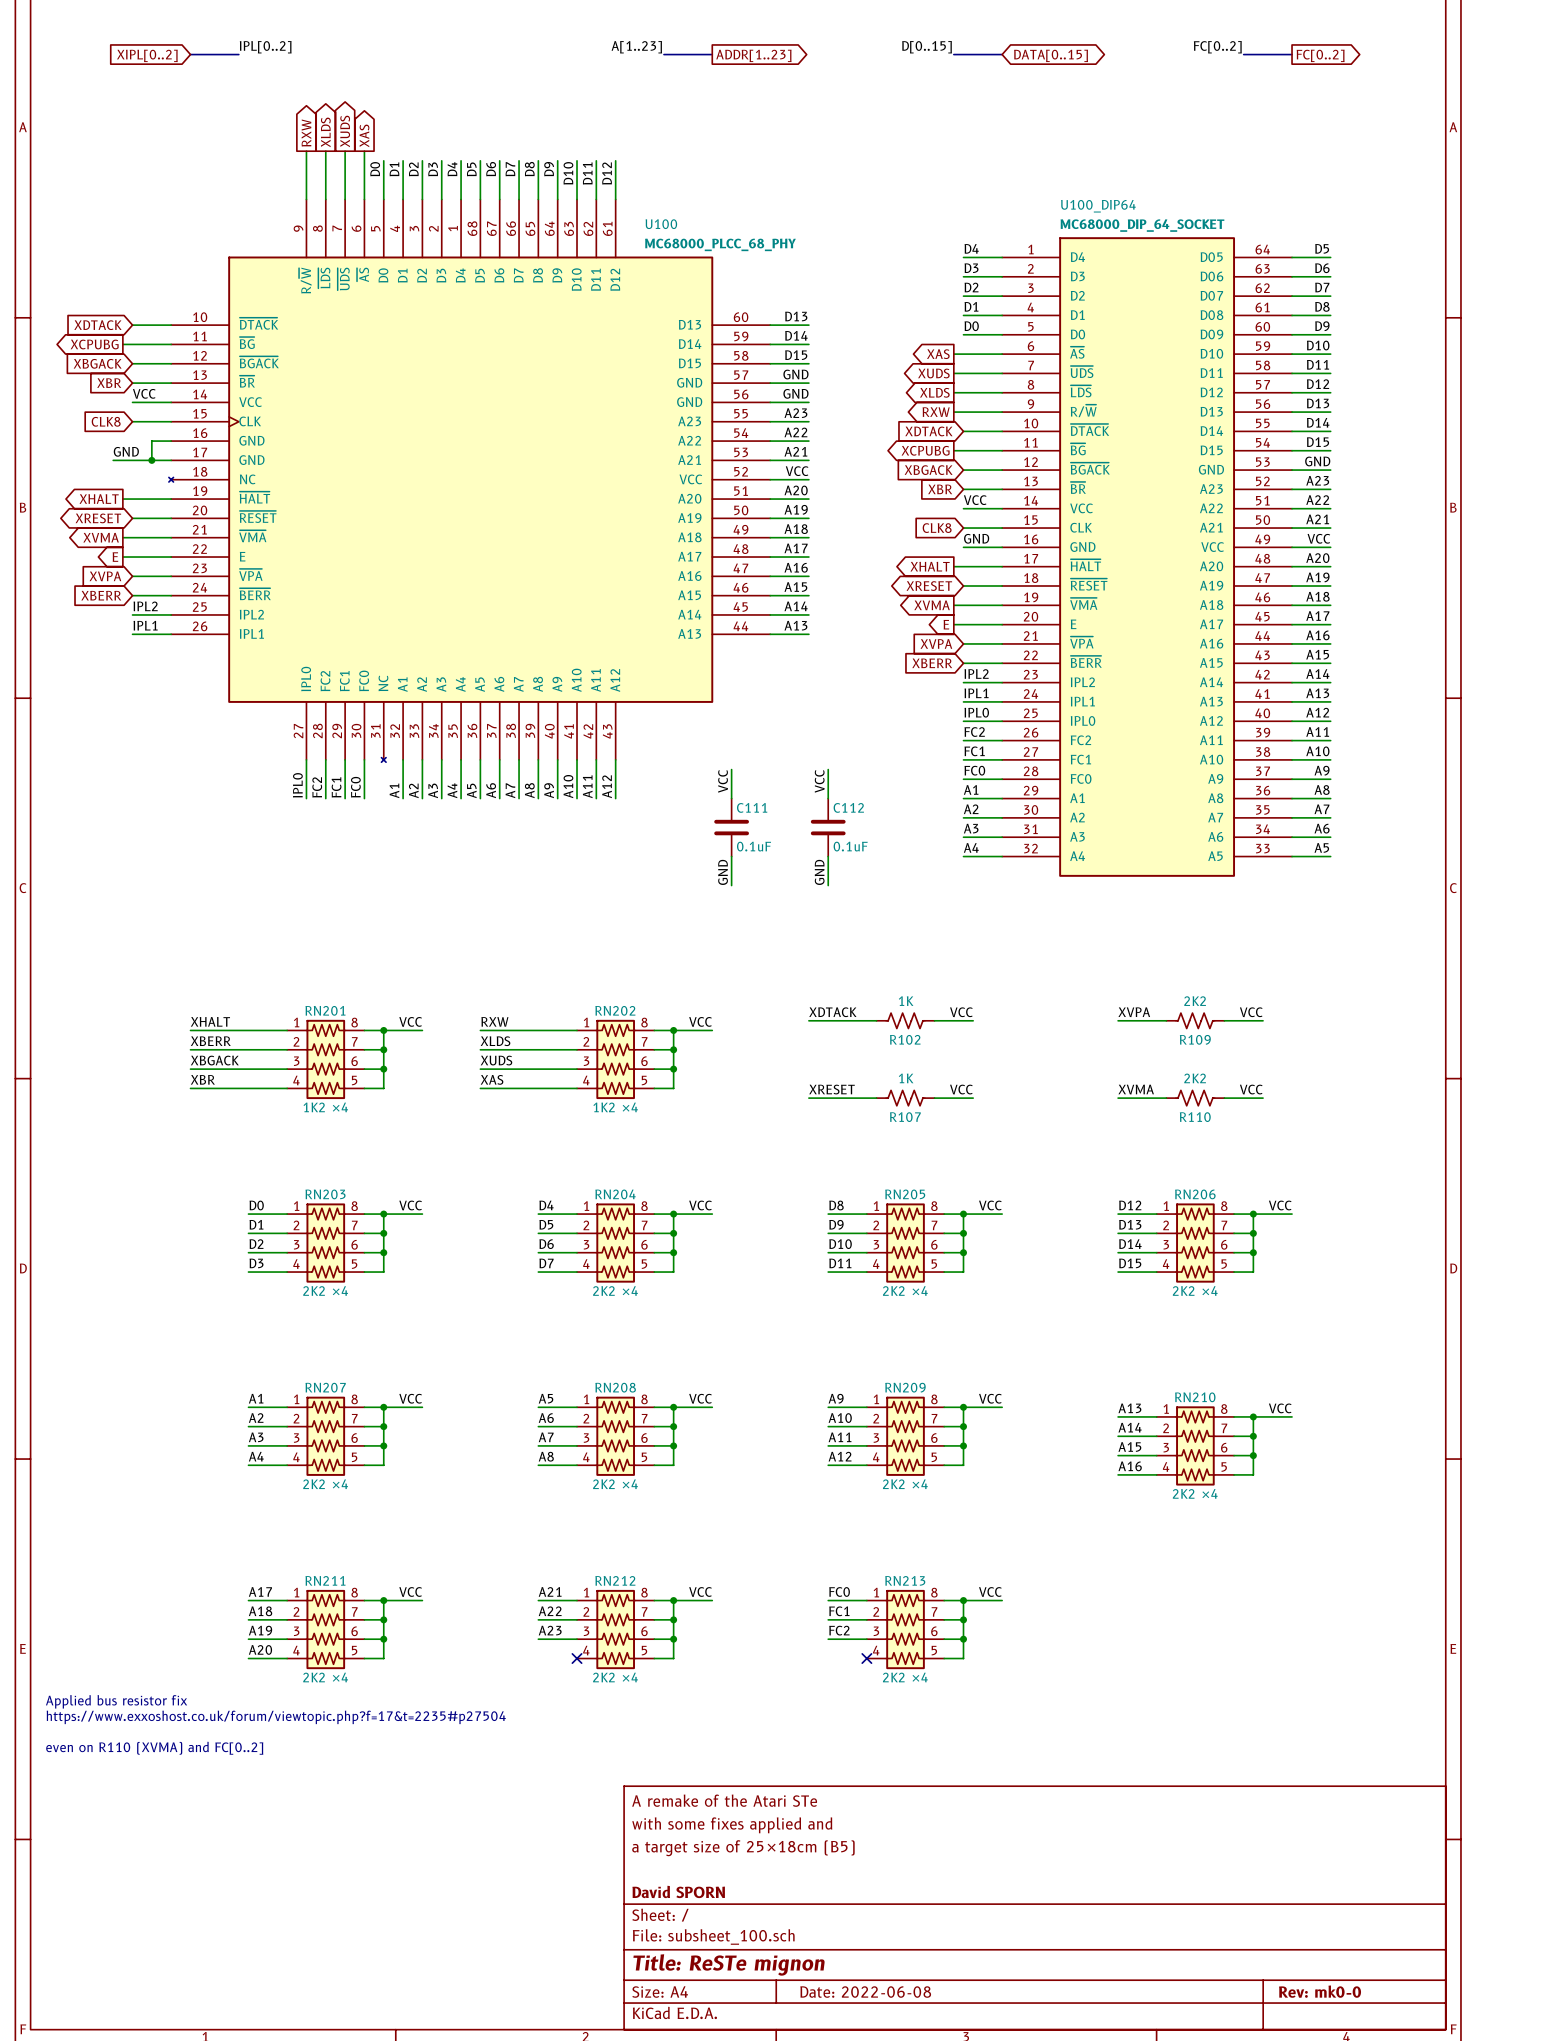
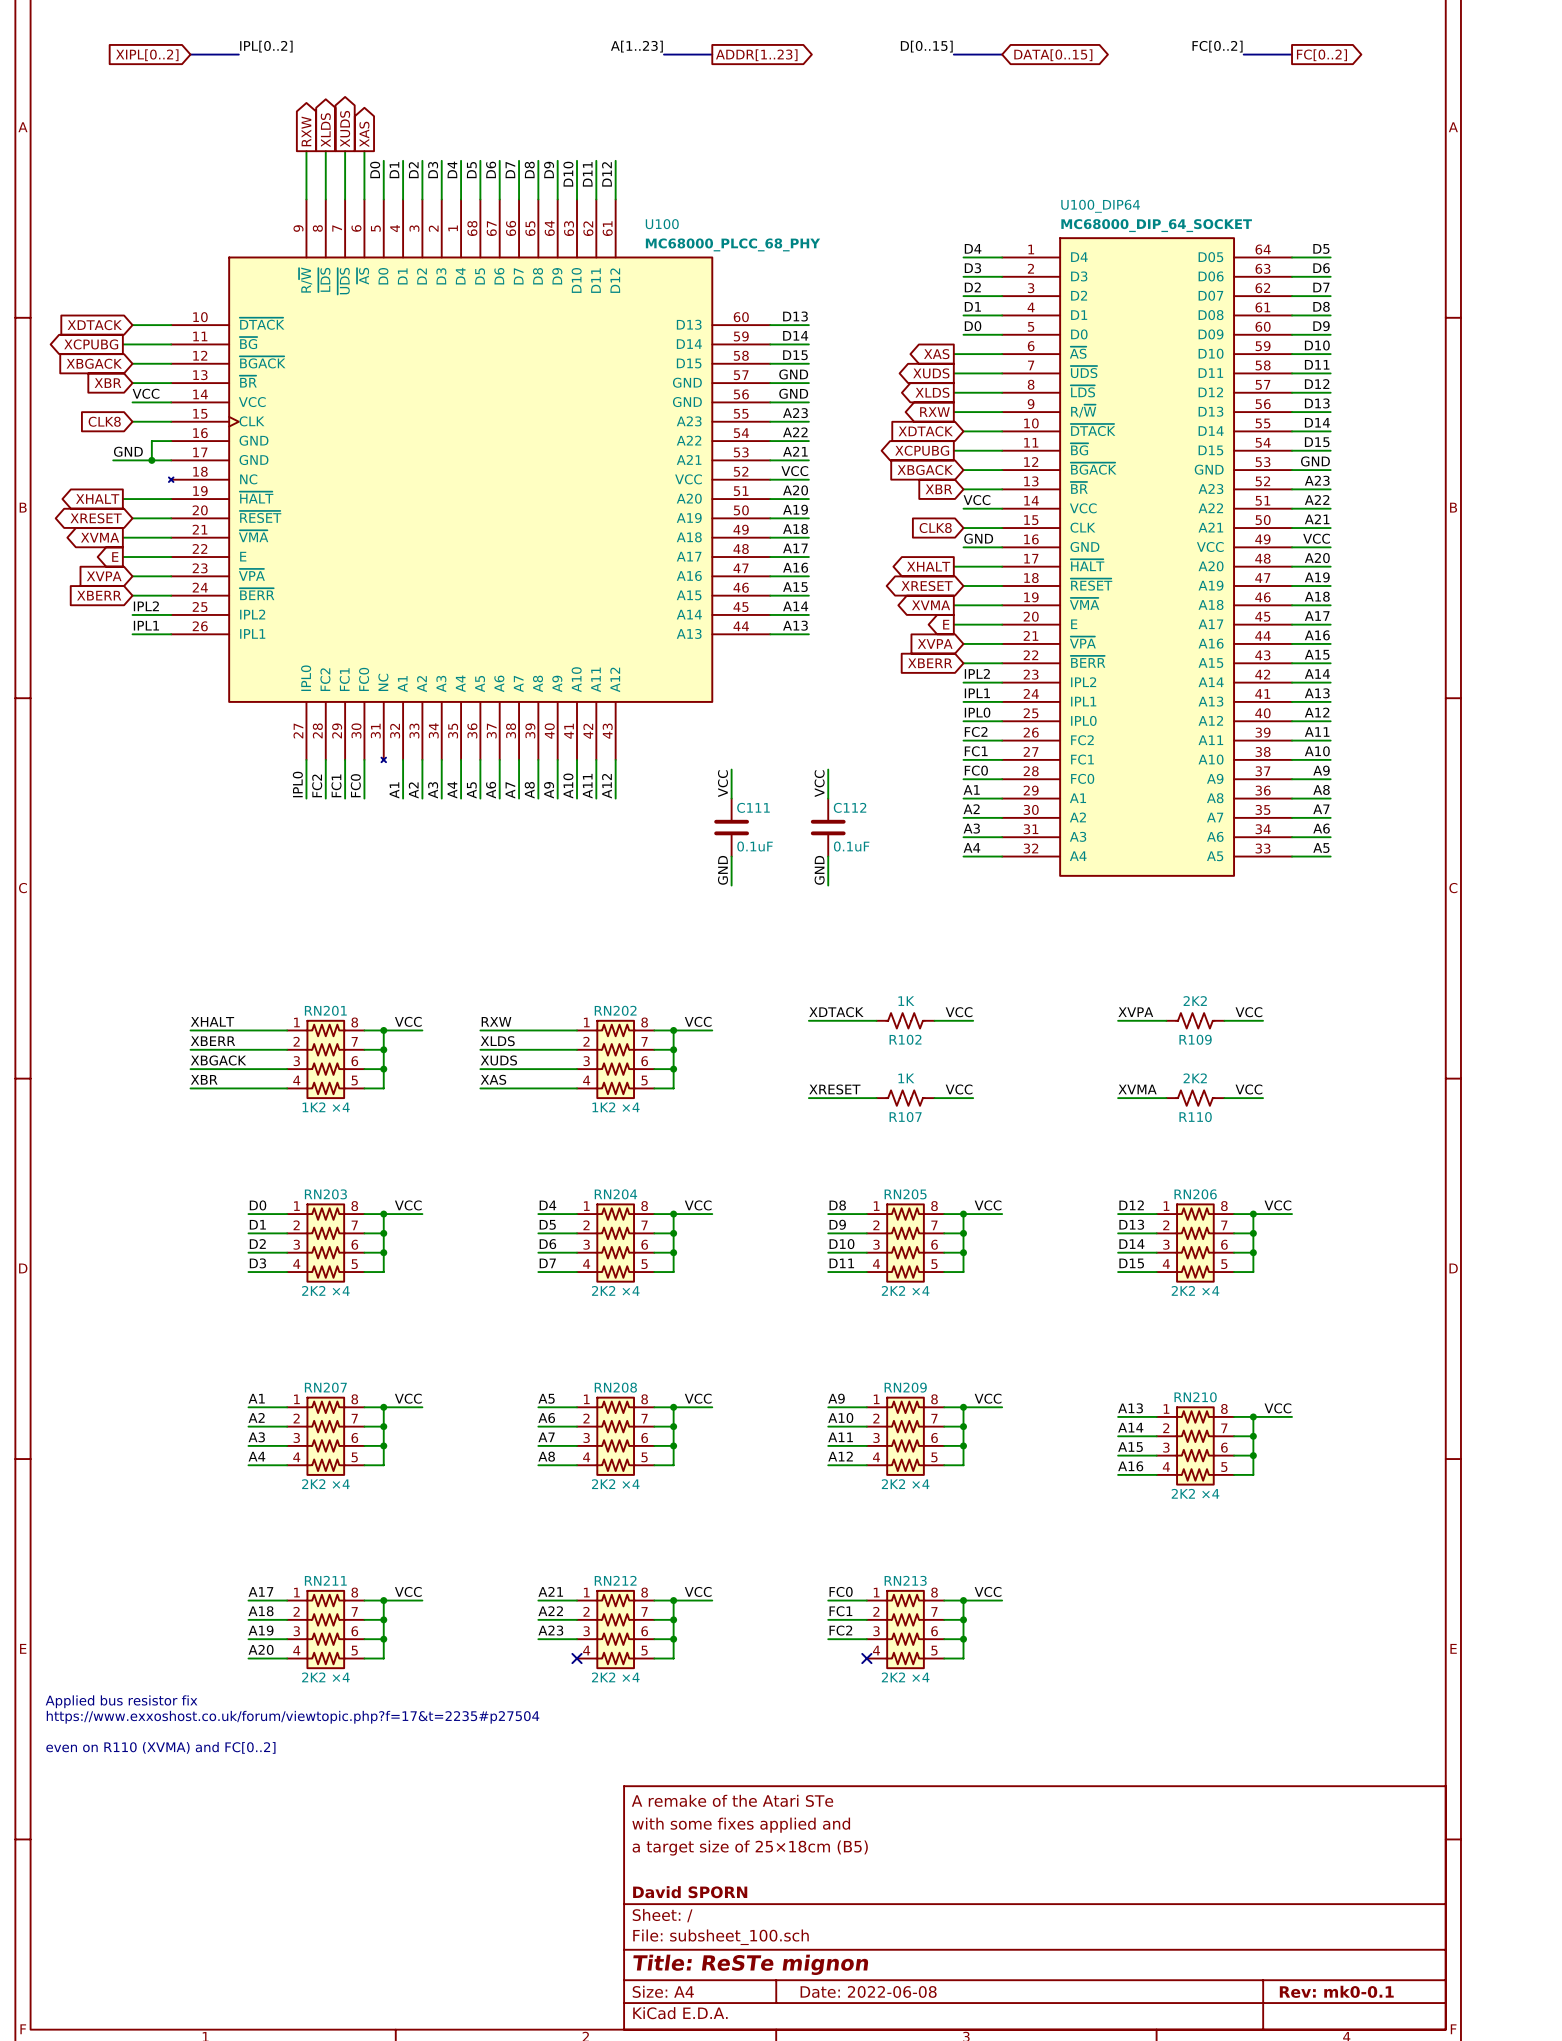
title block: Rev: mk0-0 (1320, 1991) -> Rev: mk0-0.1 (1336, 1991)

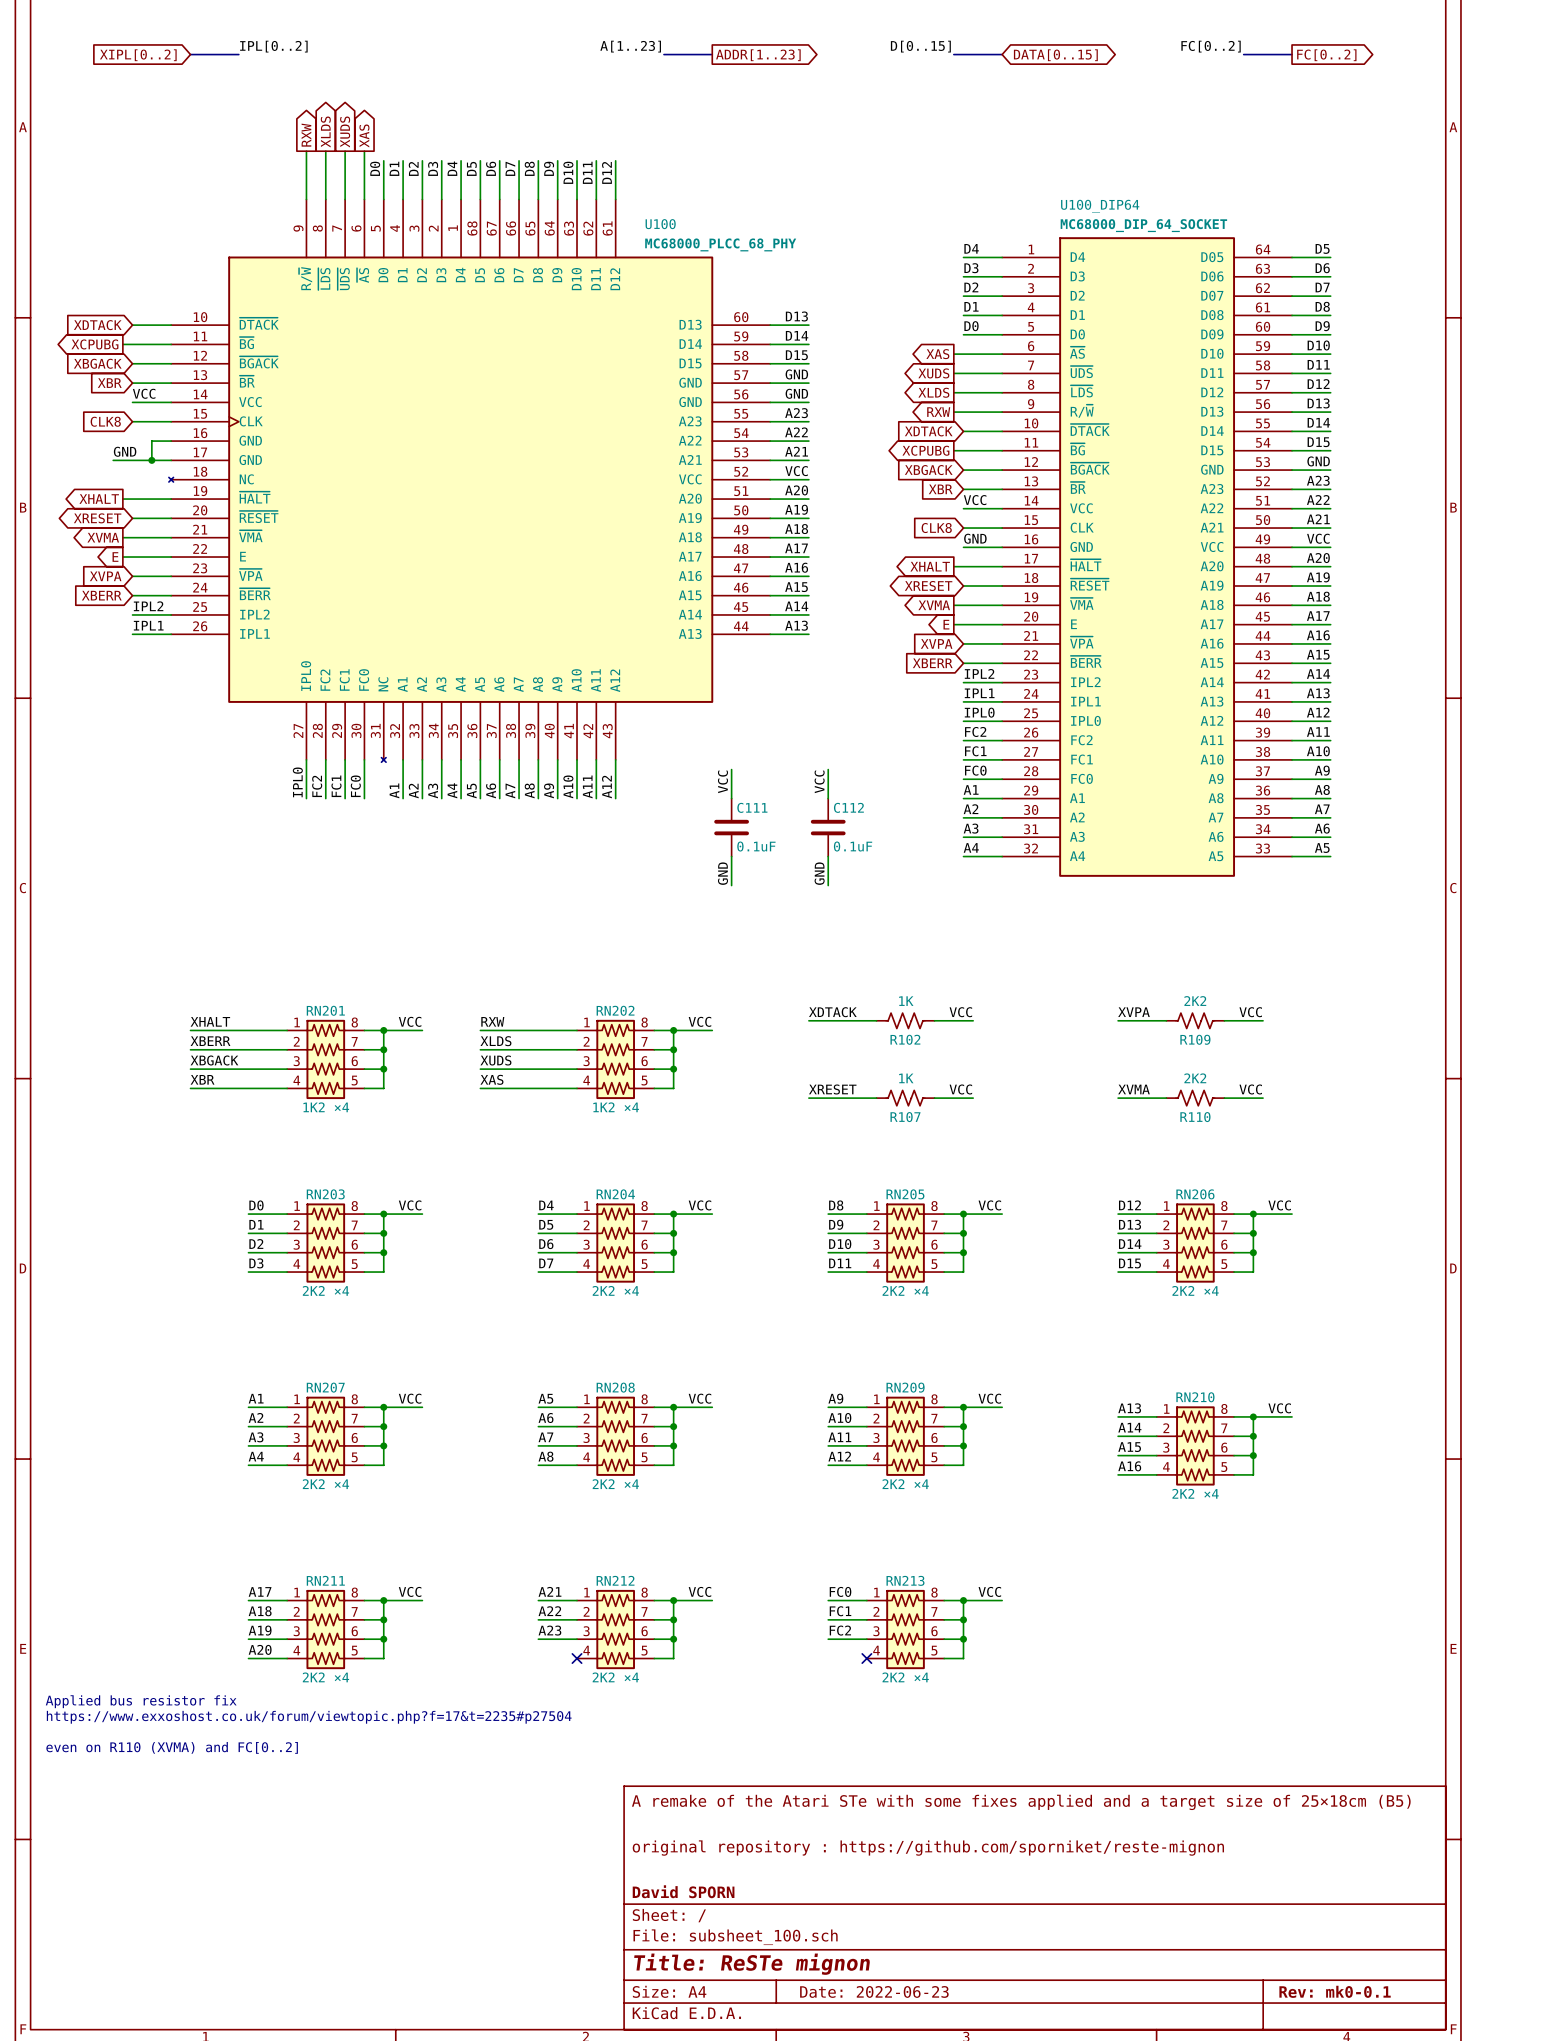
title block: A remake of the Atari STe (732, 1800) -> A remake of the Atari STe with some fixes applied and a target size of 25×18cm (B5) (1021, 1802)
title block: with some fixes applied and (741, 1825) -> none
title block: a target size of 25×18cm (B5) (750, 1848) -> original repository : https://github.com/sporniket/reste-mignon (928, 1848)
title block: Date: 2022-06-08 (868, 1991) -> Date: 2022-06-23 (874, 1991)

